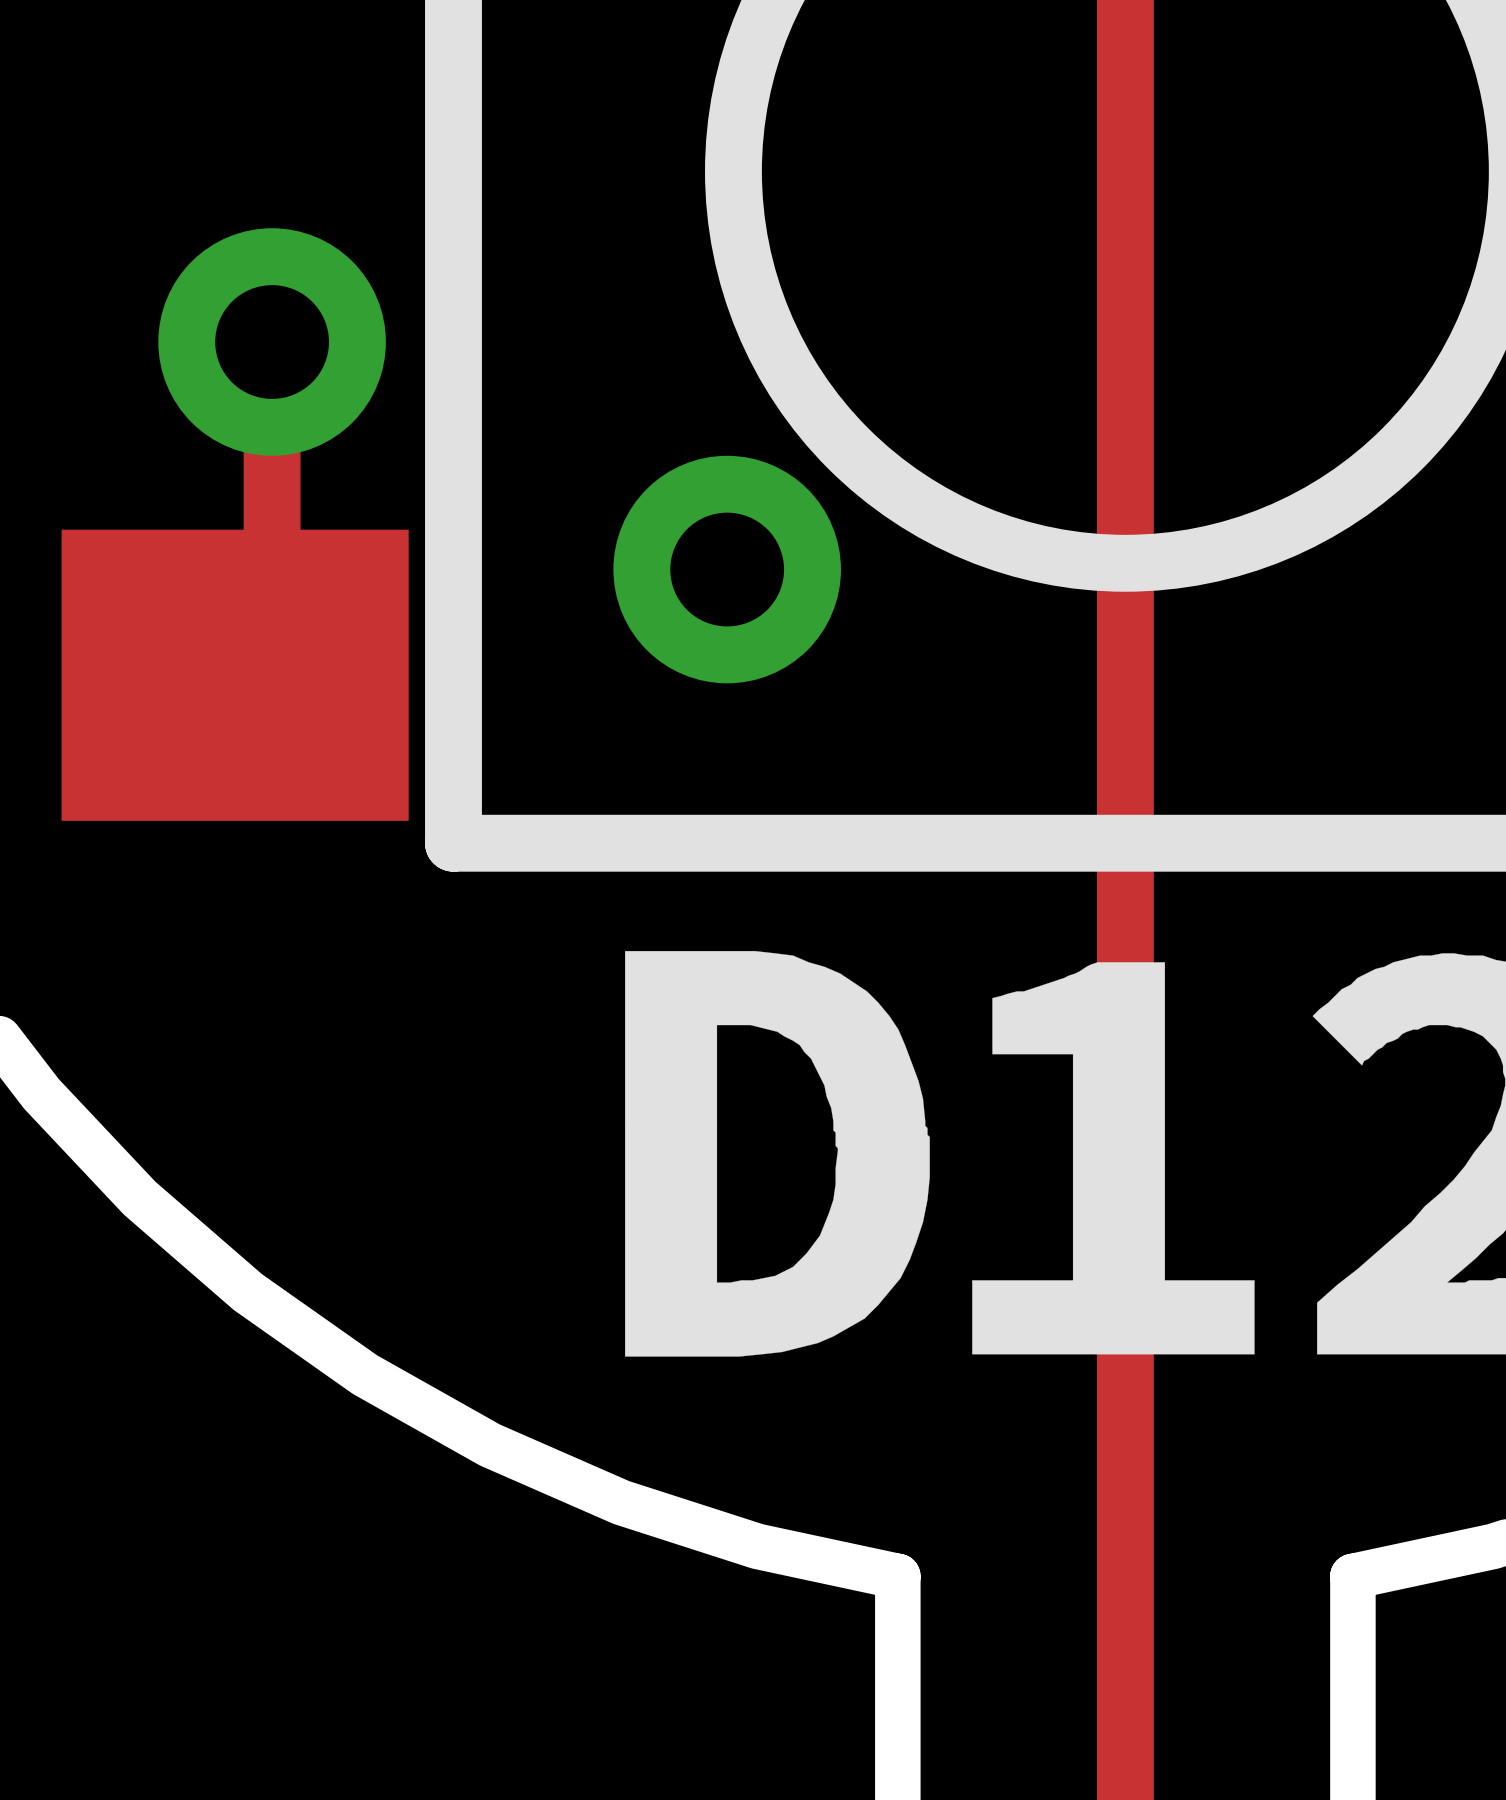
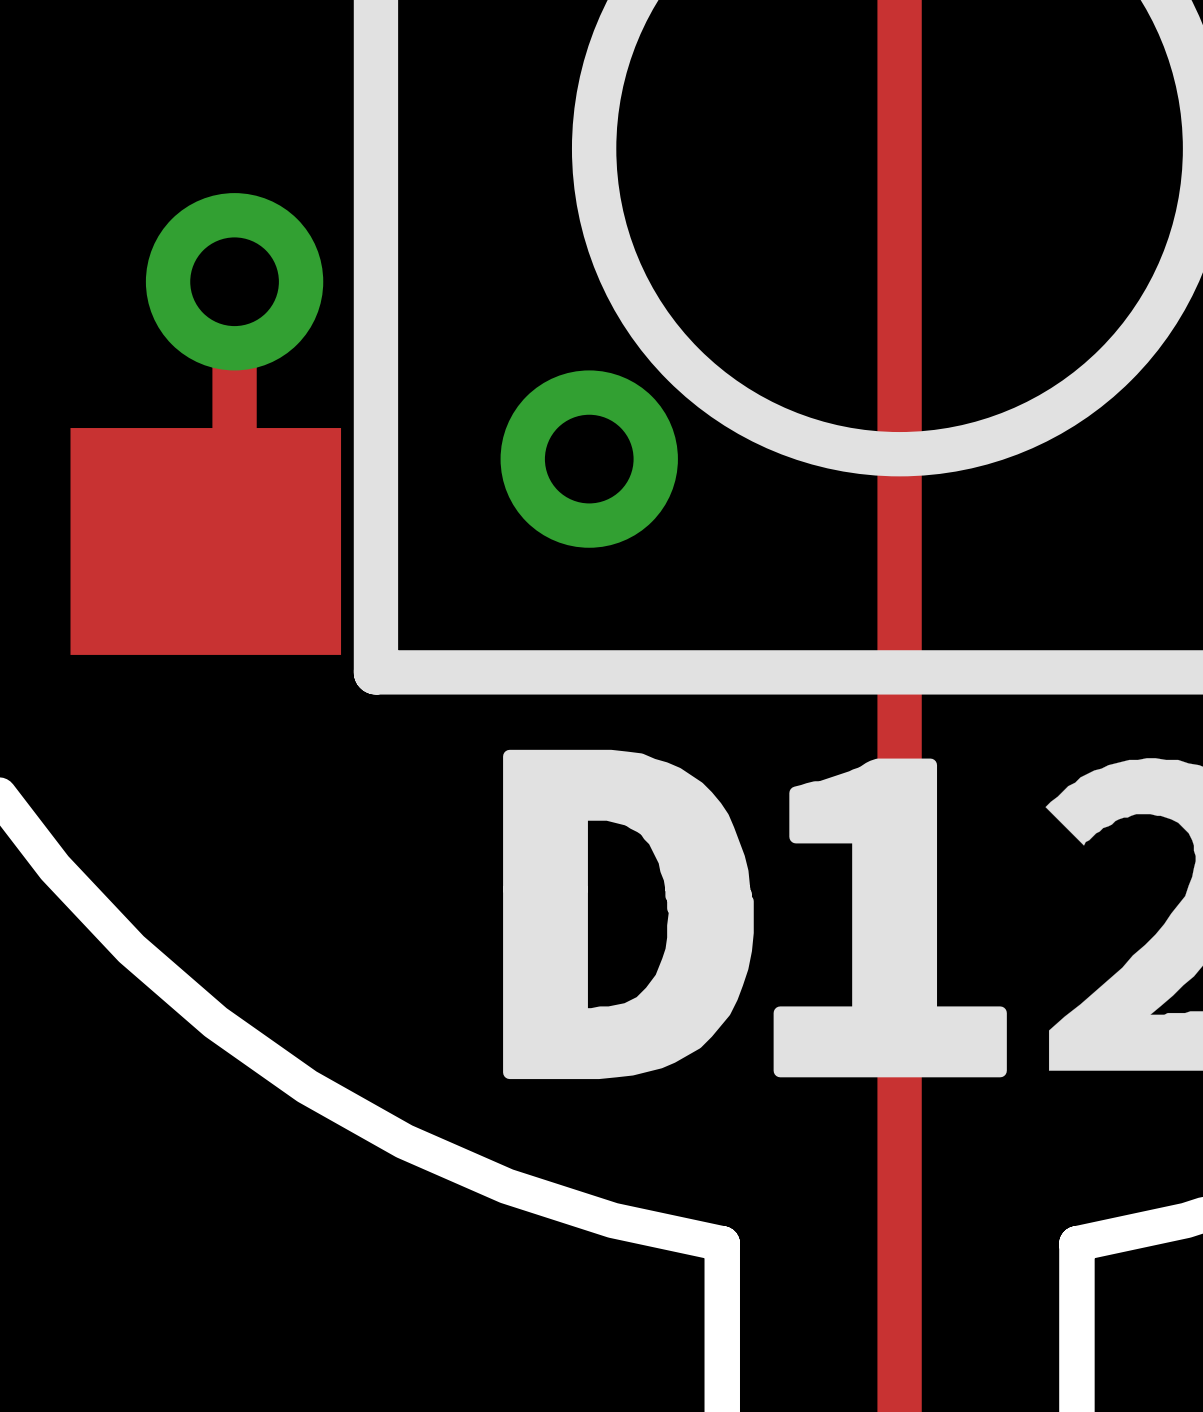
drawing shape: [625, 951, 926, 1122] -> [503, 749, 751, 896]
drawing shape: [972, 962, 1255, 1355] -> [773, 758, 1007, 1078]
drawing shape: [625, 1121, 930, 1357] -> [503, 882, 754, 1080]

